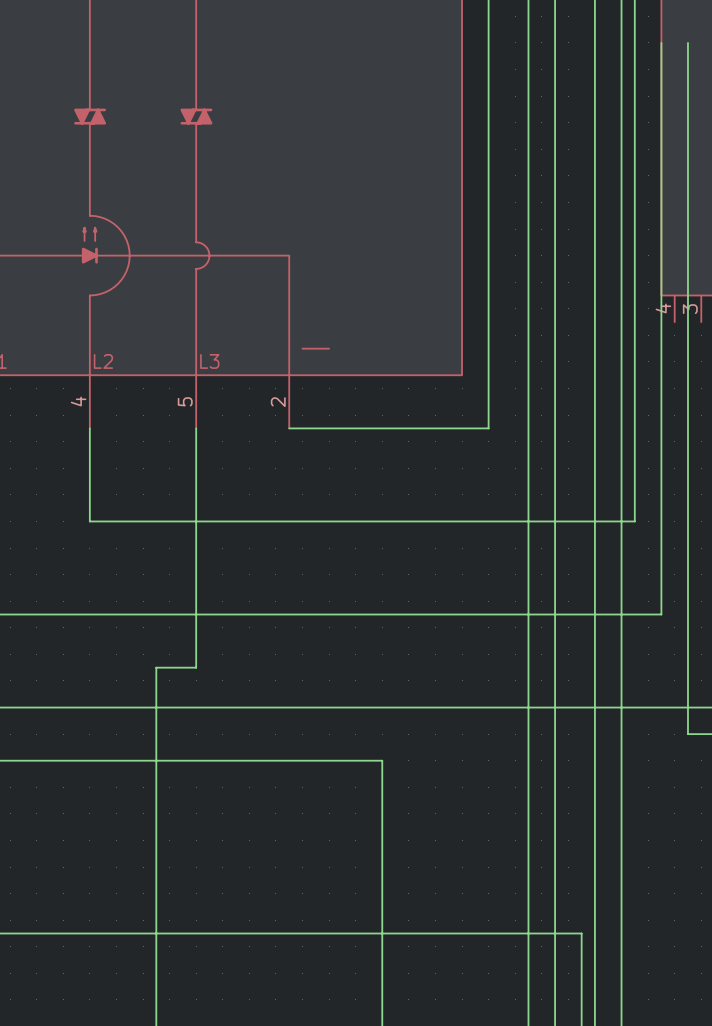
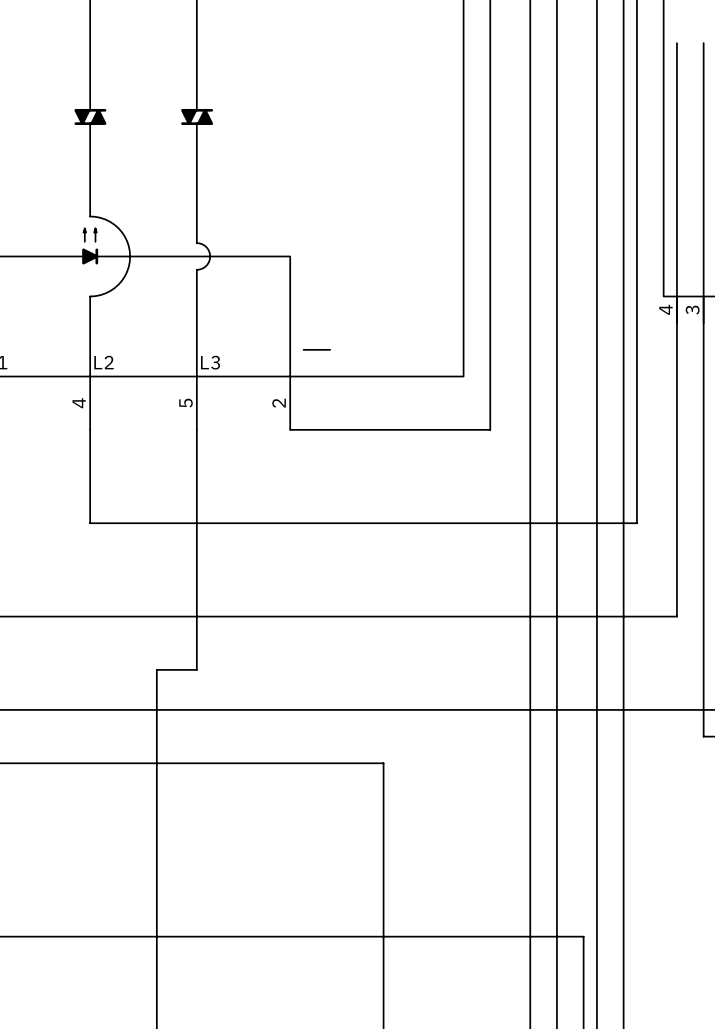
wire: (661, 42) (661, 614) -> (676, 43) (676, 616) (663, 616)
wire: (687, 42) (687, 734) (701, 734) -> (703, 43) (703, 736)

